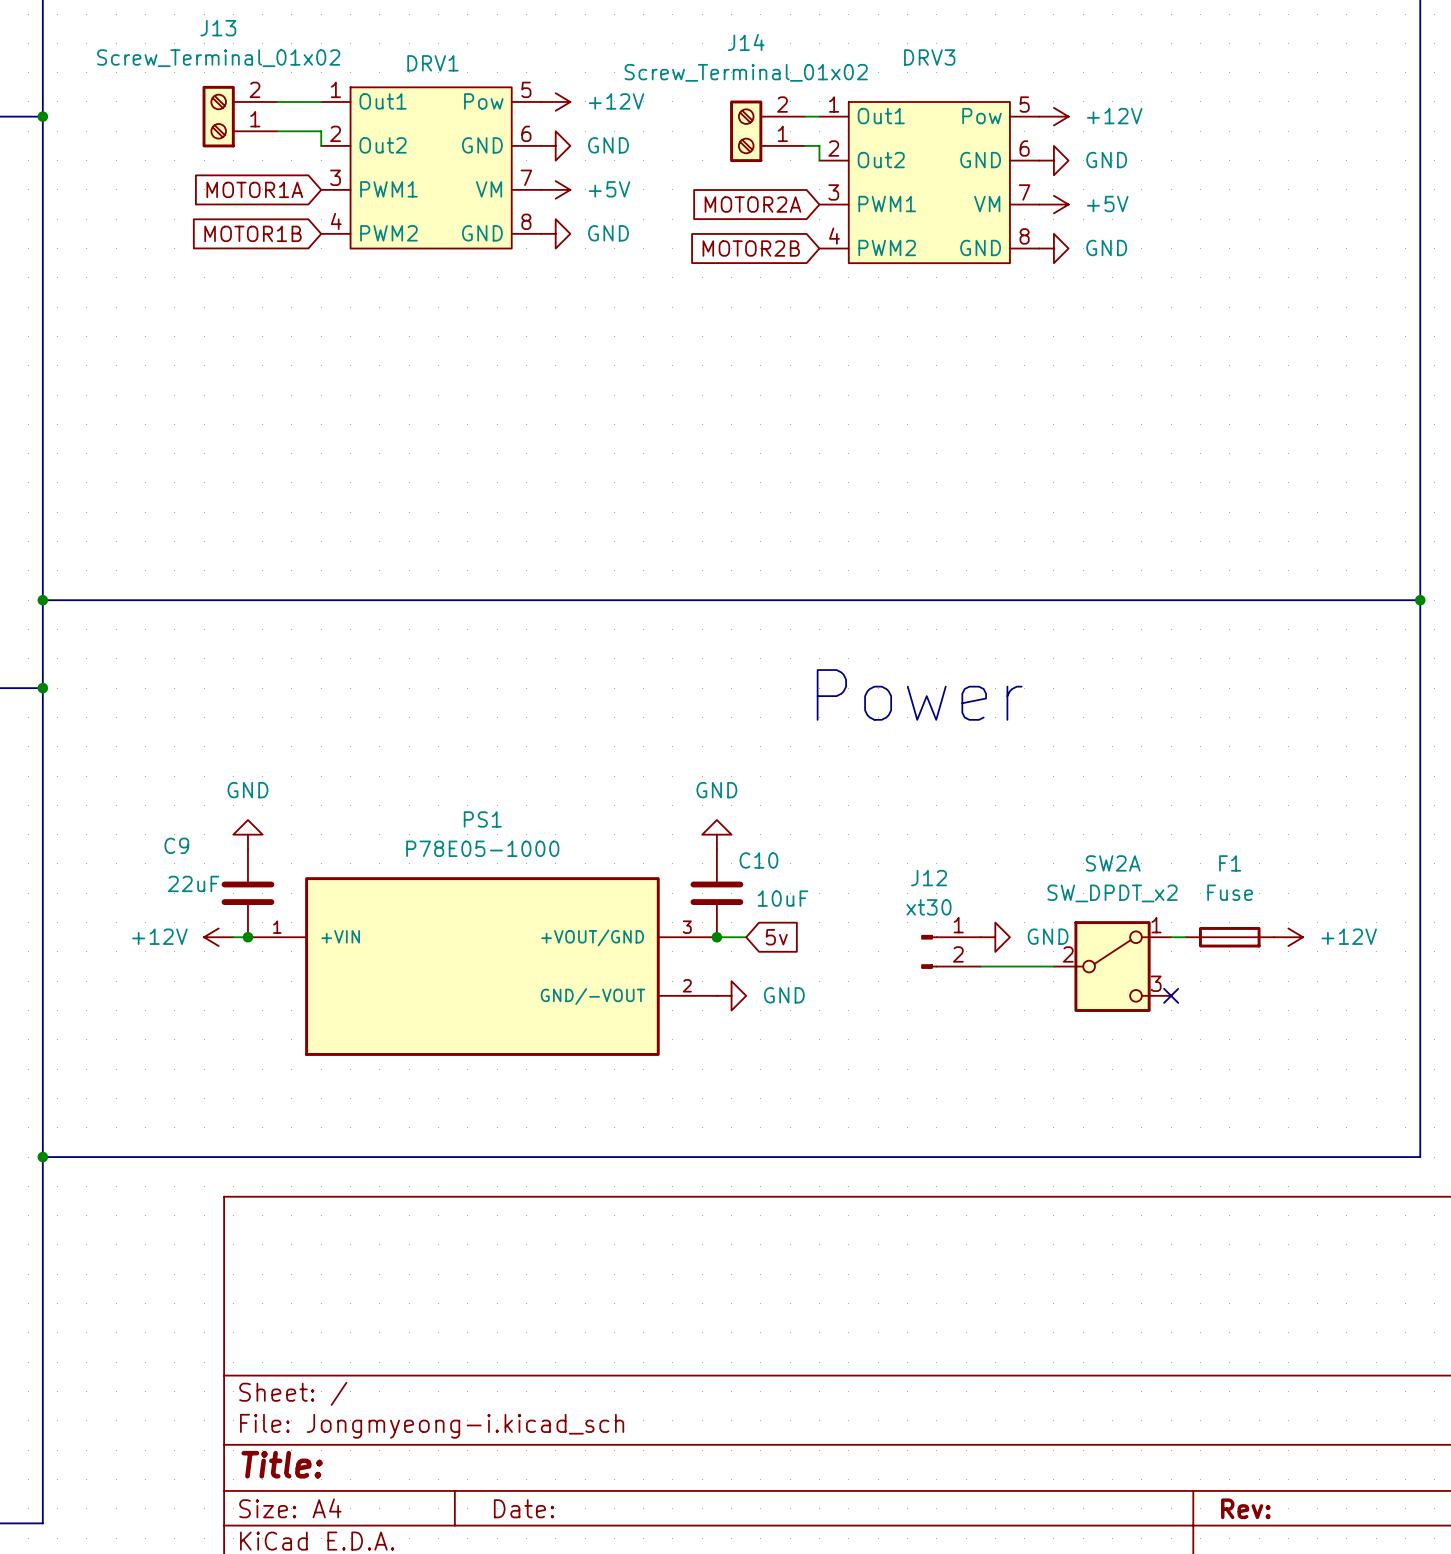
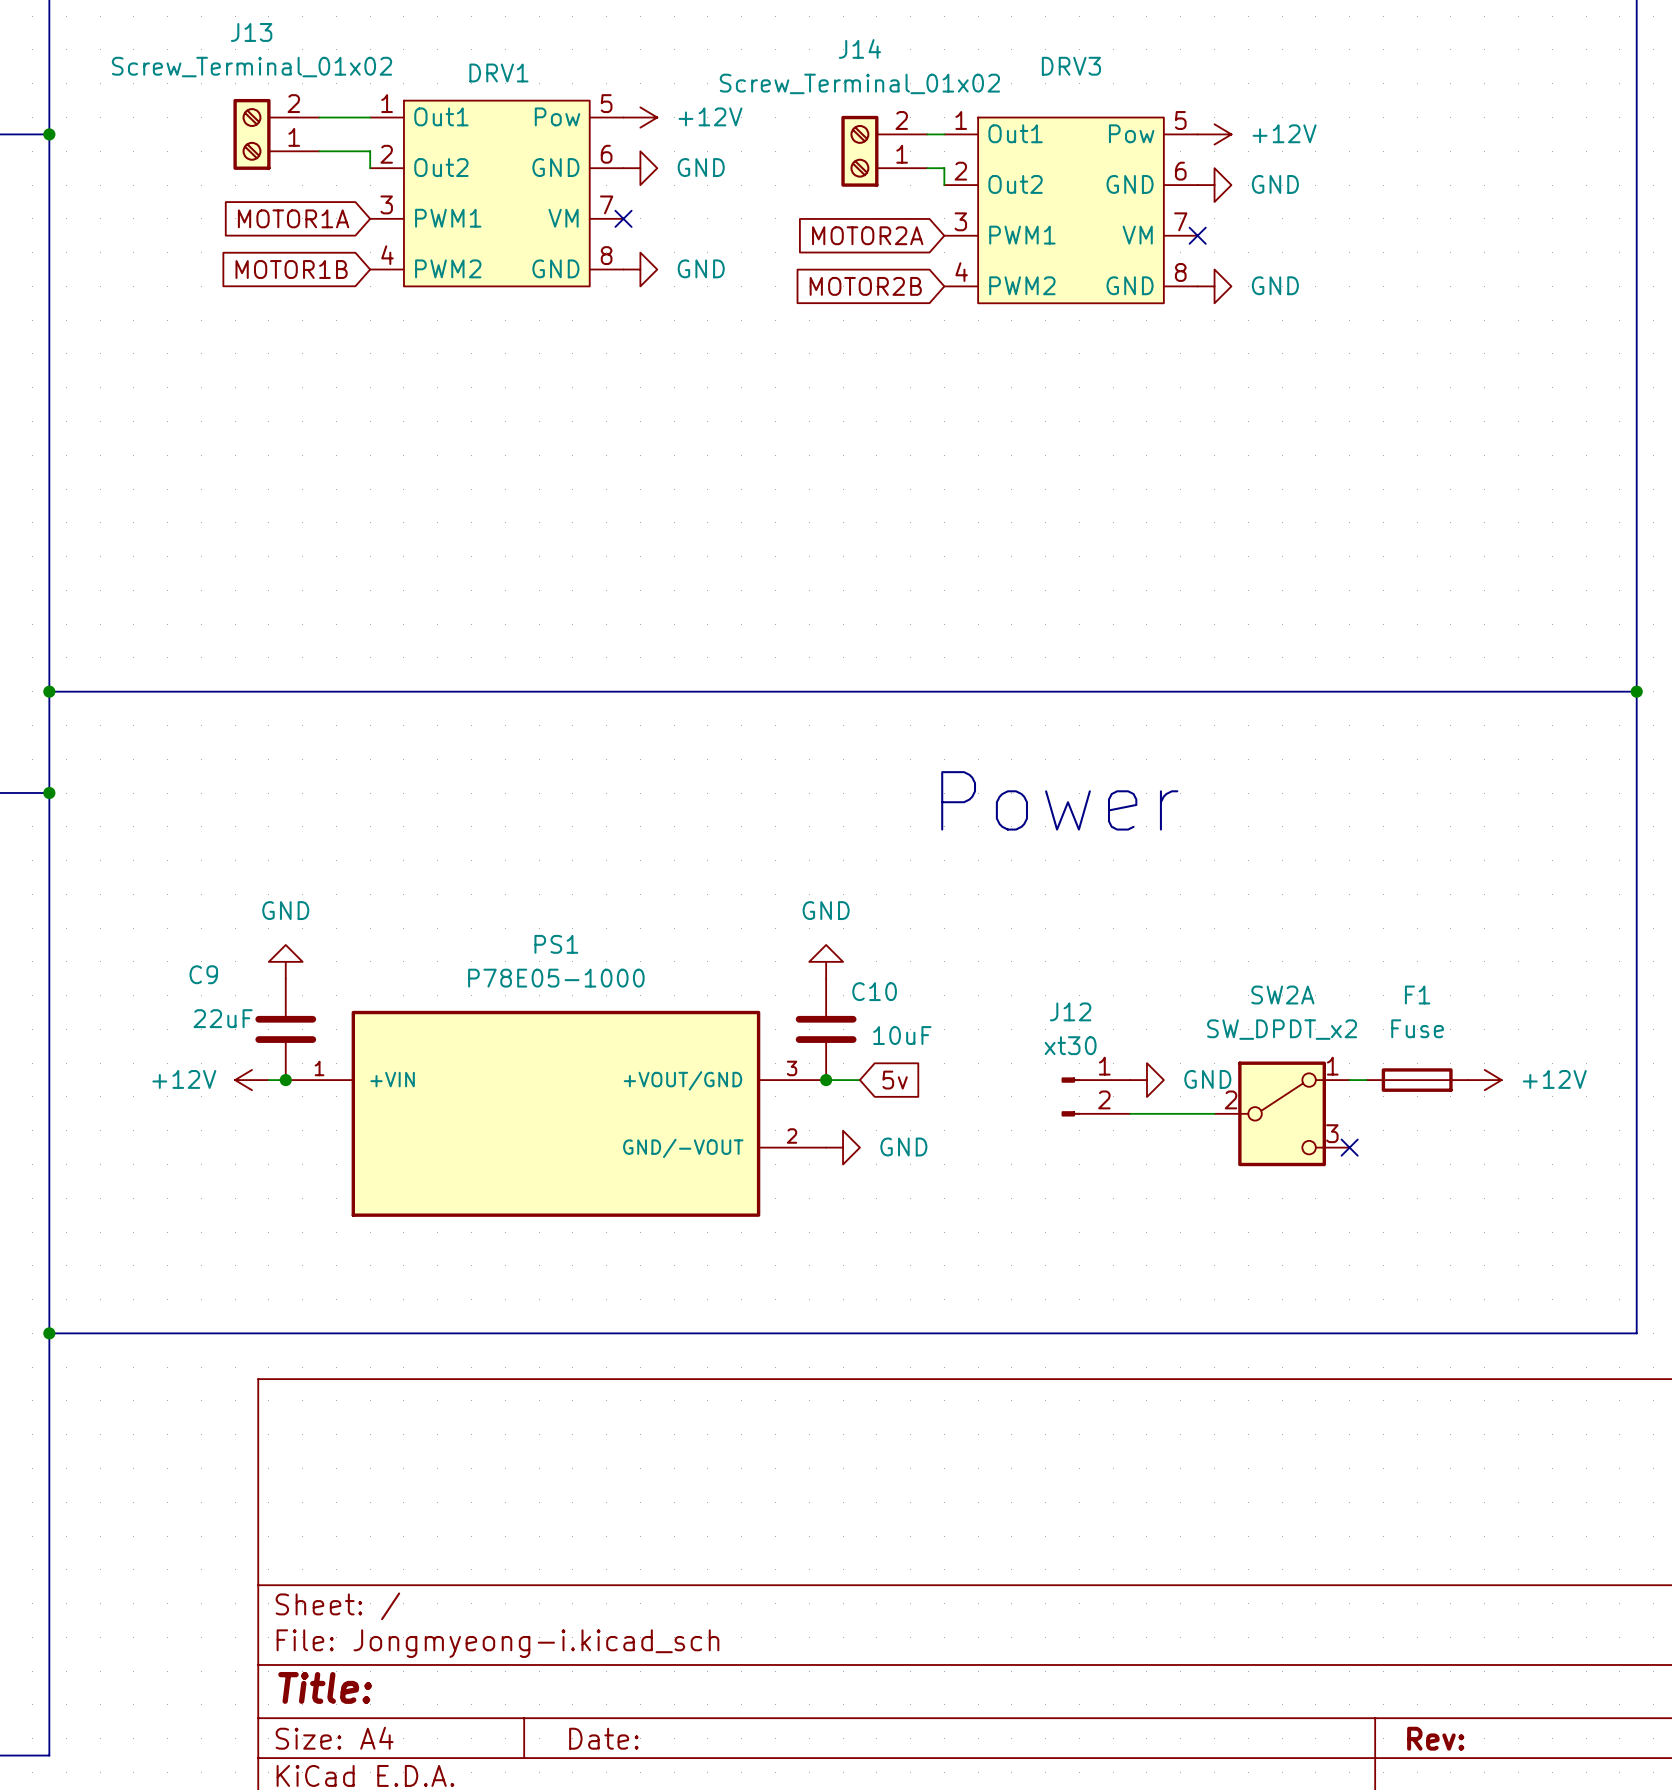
no-connect mark: none -> (623, 218)
power symbol: +5V (555, 189) -> none
no-connect mark: none -> (1197, 235)
power symbol: +5V (1053, 204) -> none

